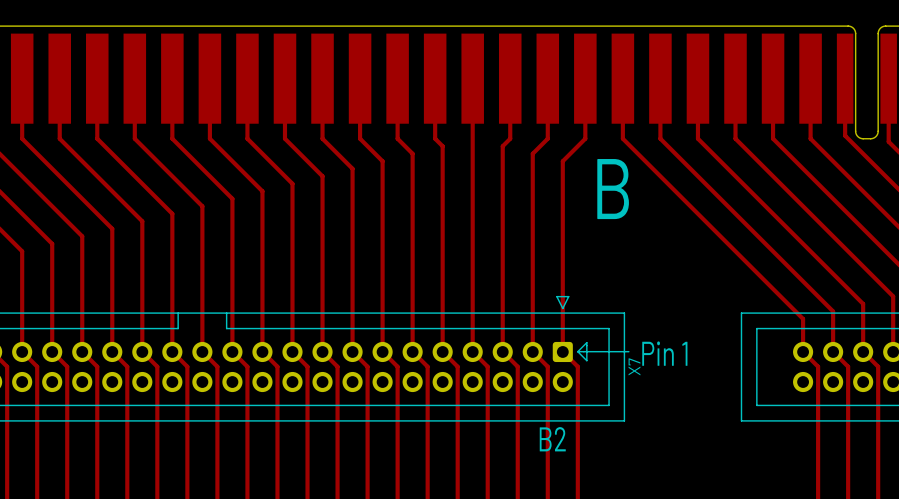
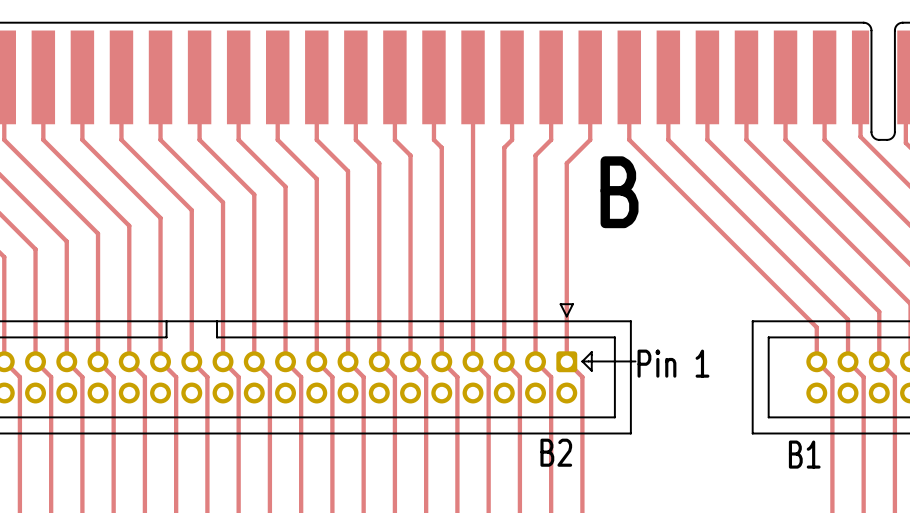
X7 name: X7 (634, 366) -> none
text: none -> B1 (804, 454)

